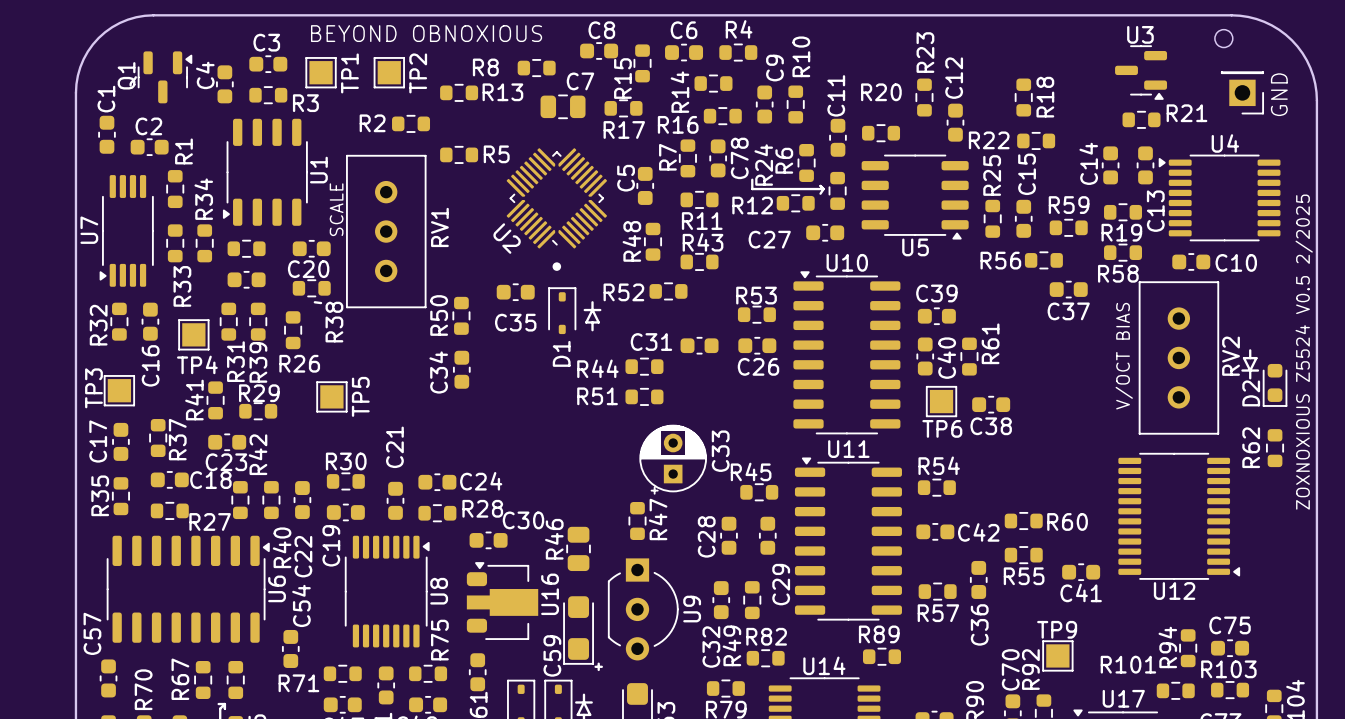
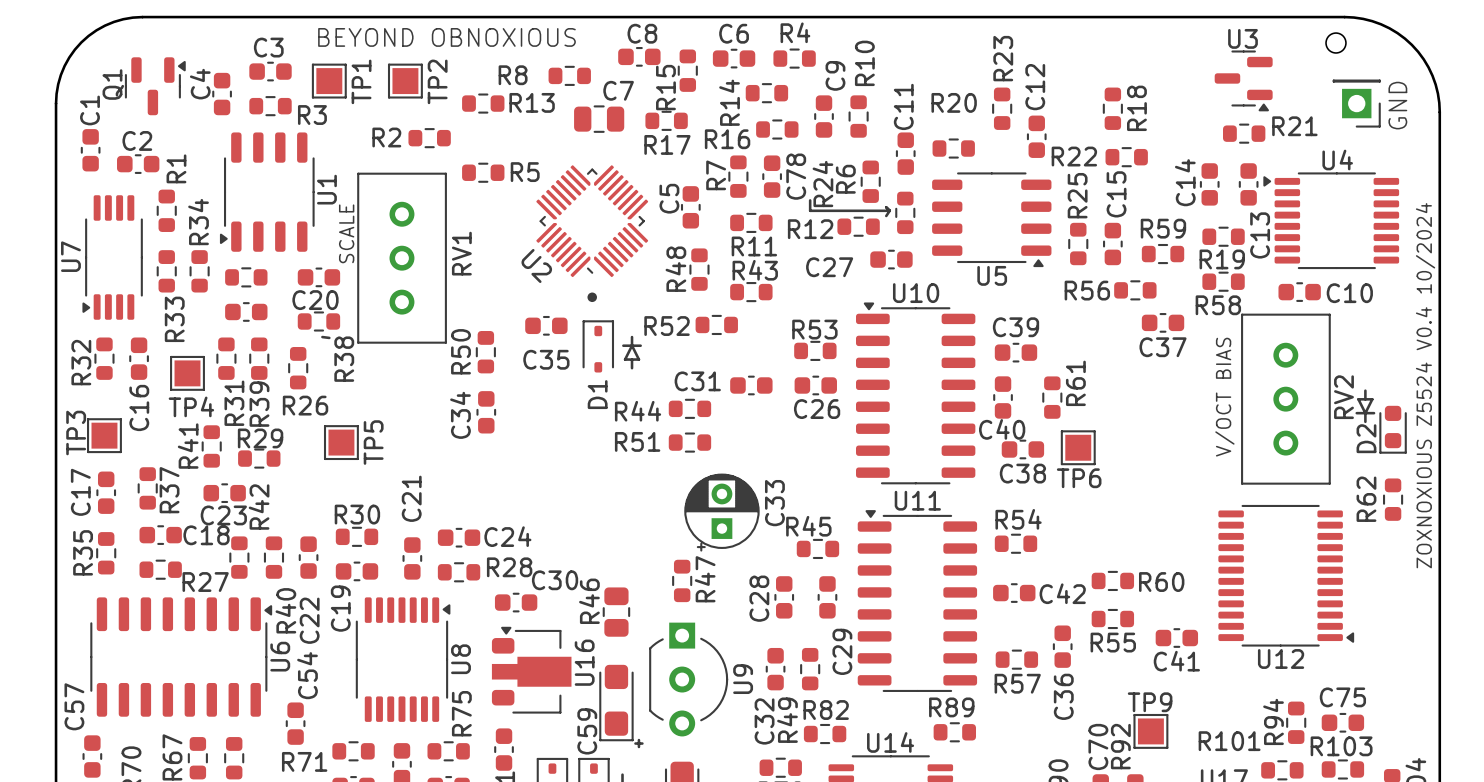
text: ZOXNOXIOUS Z5524 V0.5 2/2025 (1304, 352) -> ZOXNOXIOUS Z5524 V0.4 10/2024 (1425, 385)
C40 name rotation: 0° (946, 358) -> 90° clockwise (1002, 429)
TP6 position: (941, 401) -> (1078, 447)
C38 position: (991, 404) -> (1022, 449)

